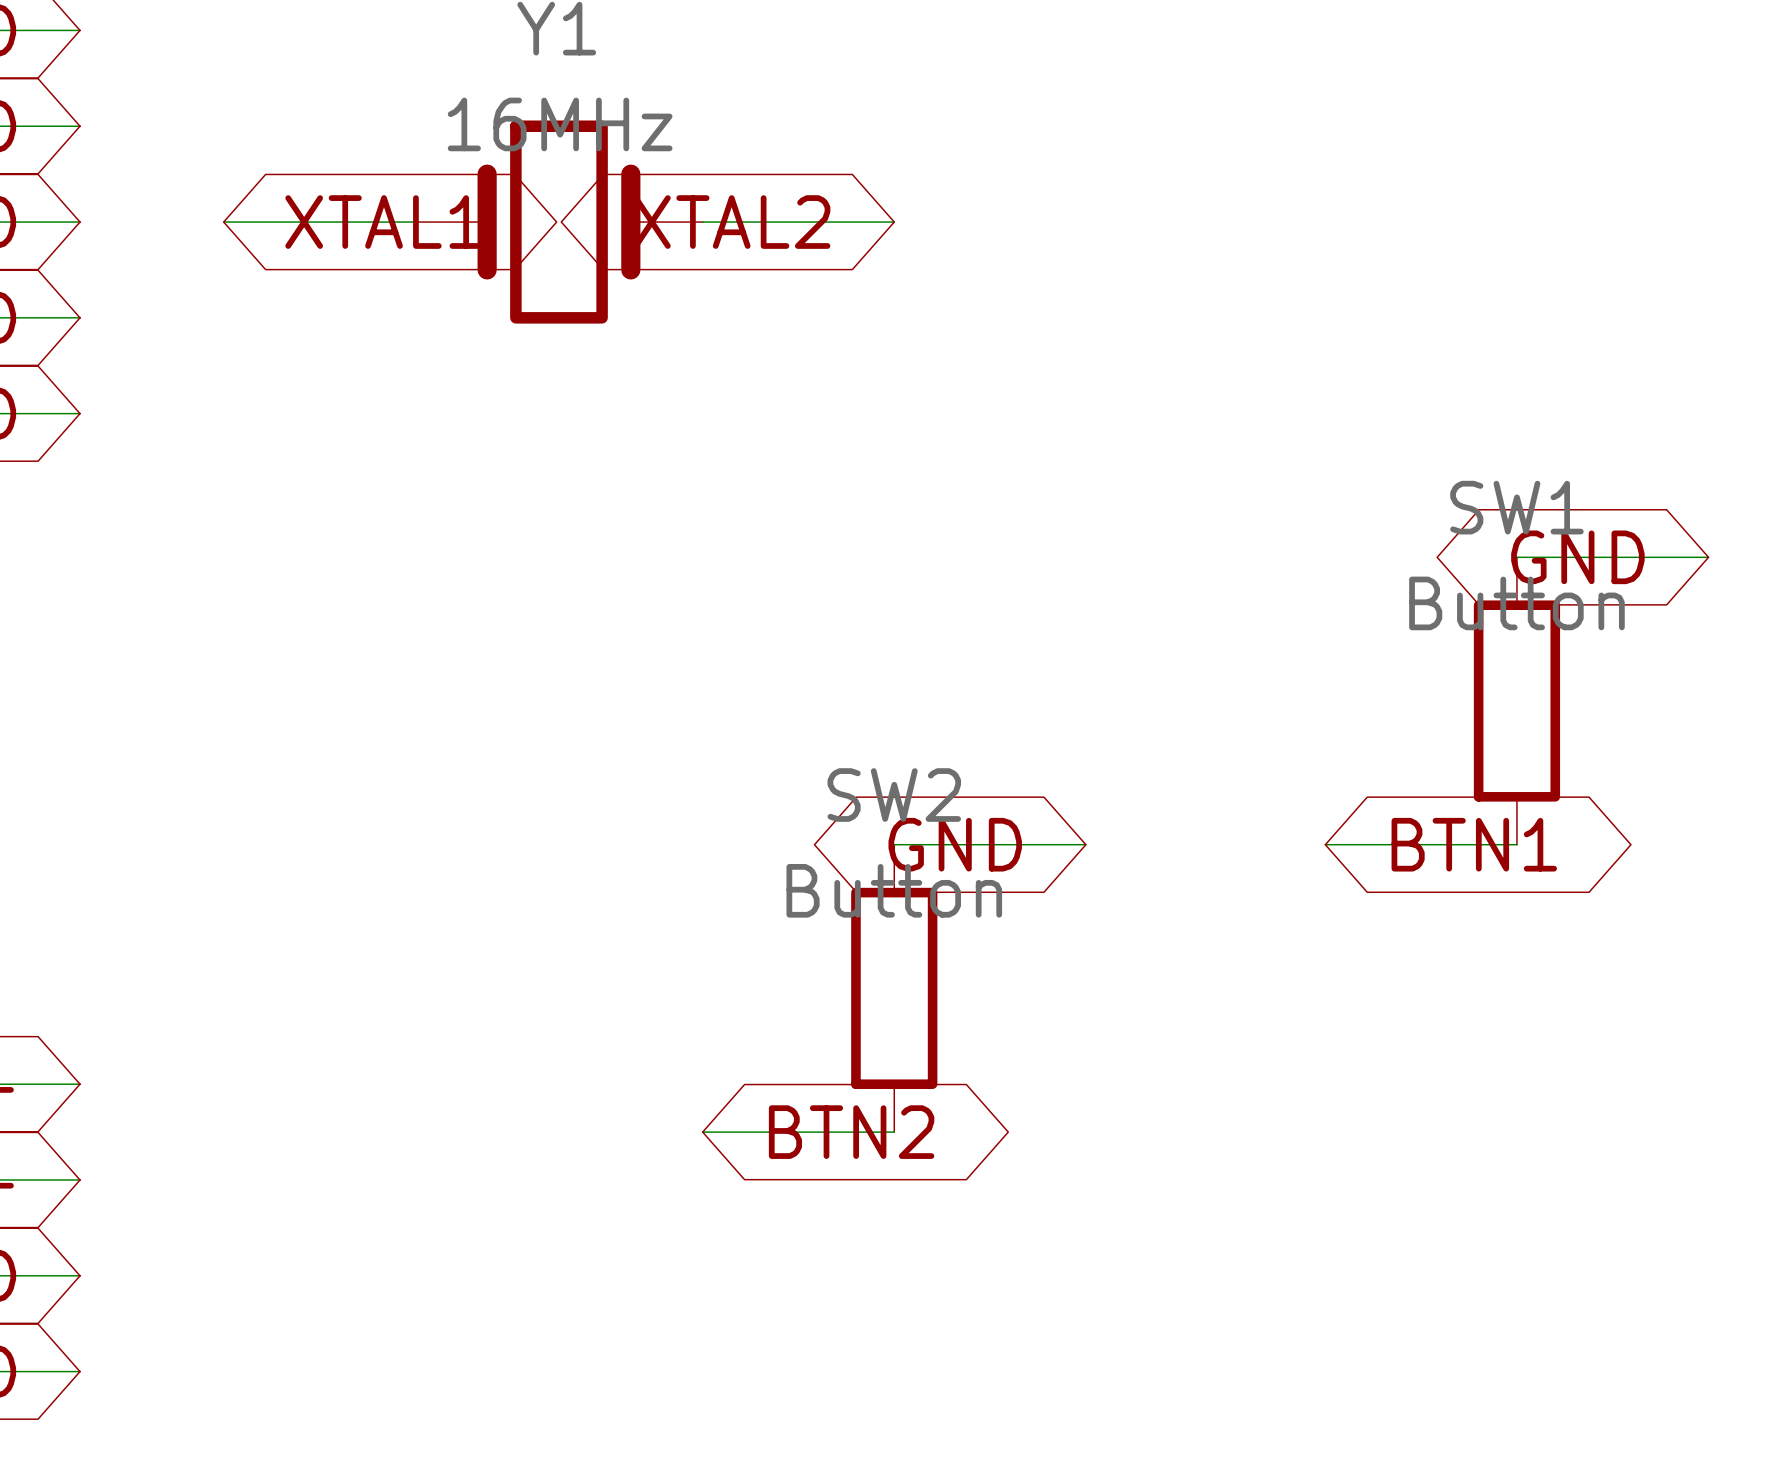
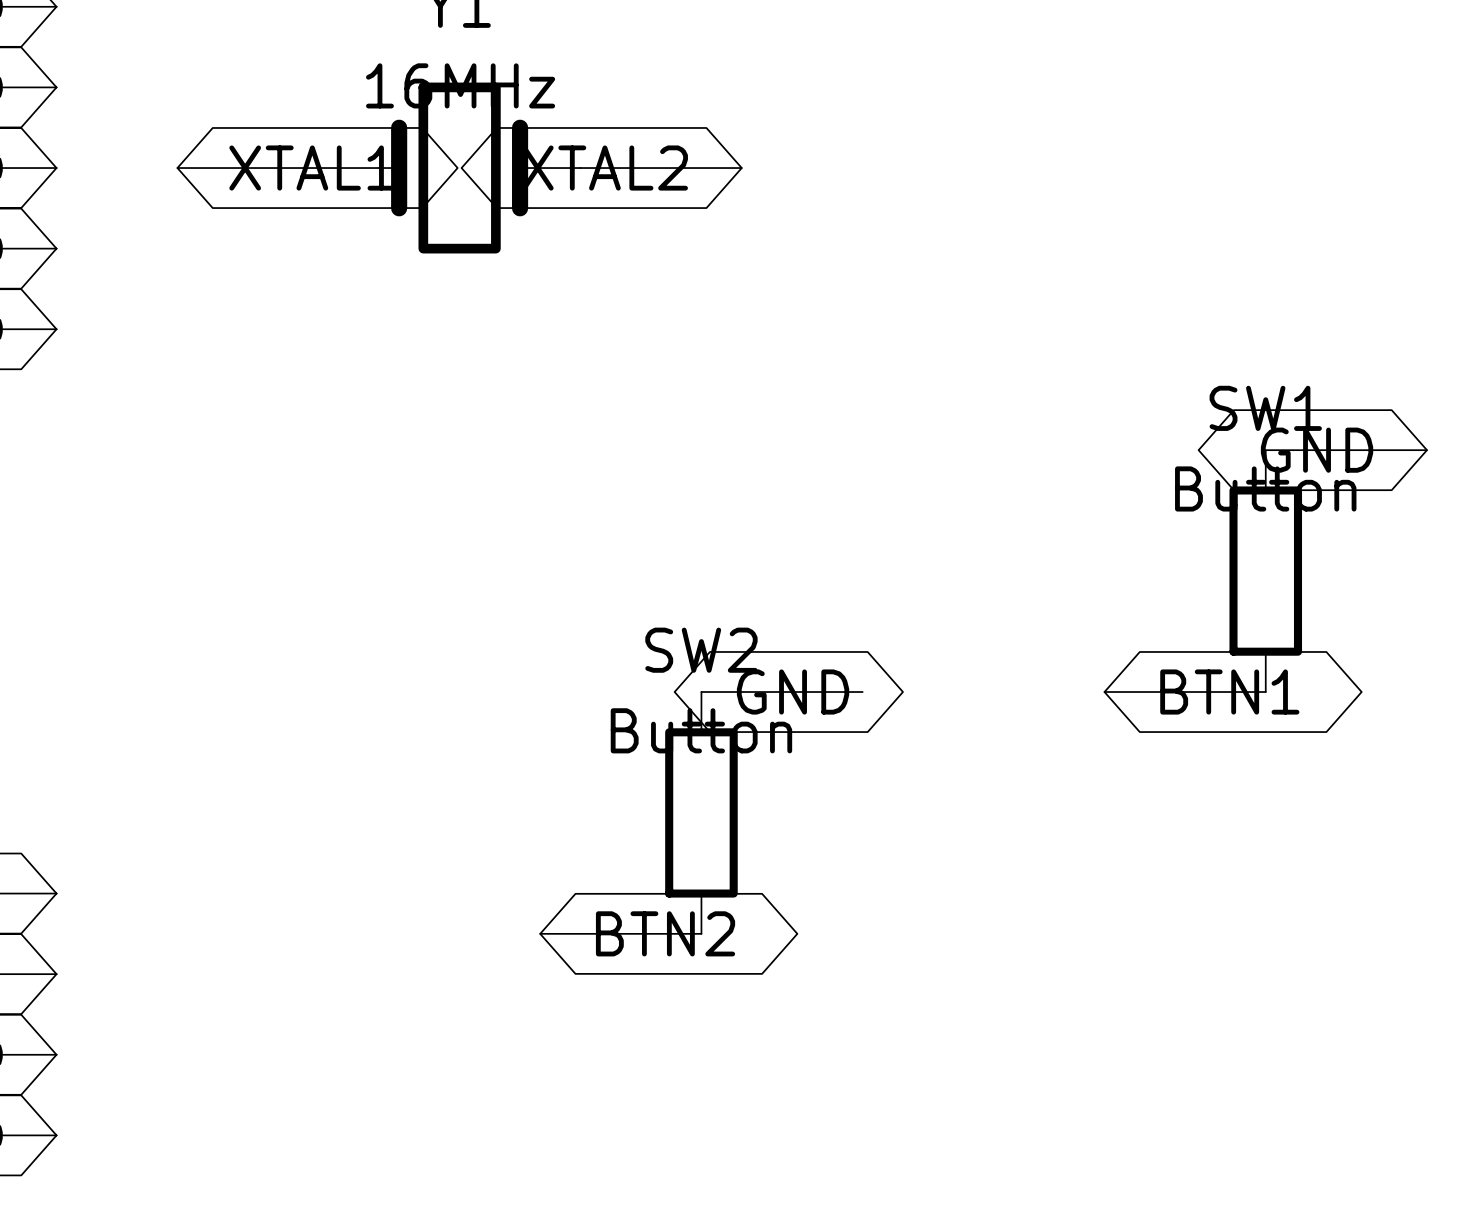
wire: (1037, 844) (1085, 844) -> (701, 692) (741, 692)
SW2 position: (894, 988) -> (701, 812)
wire: (846, 1132) (894, 1132) -> (540, 933) (580, 933)
global label position: BTN2 (851, 1132) -> BTN2 (665, 933)

